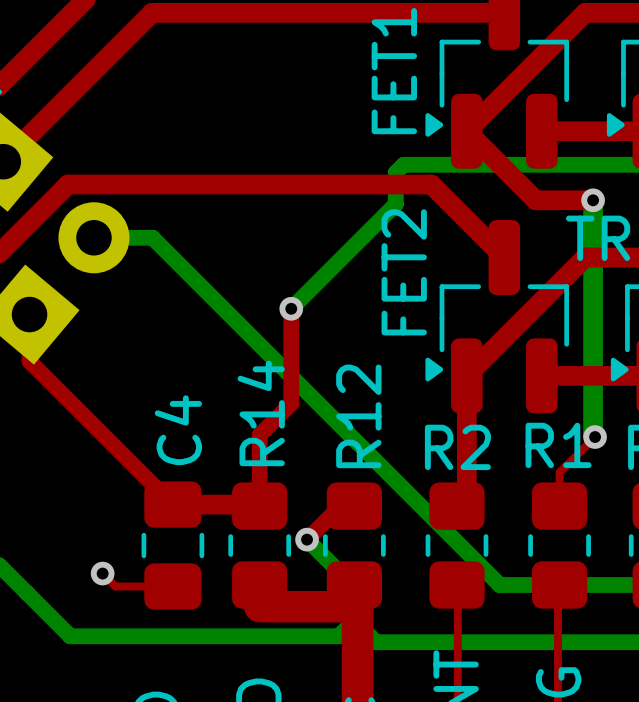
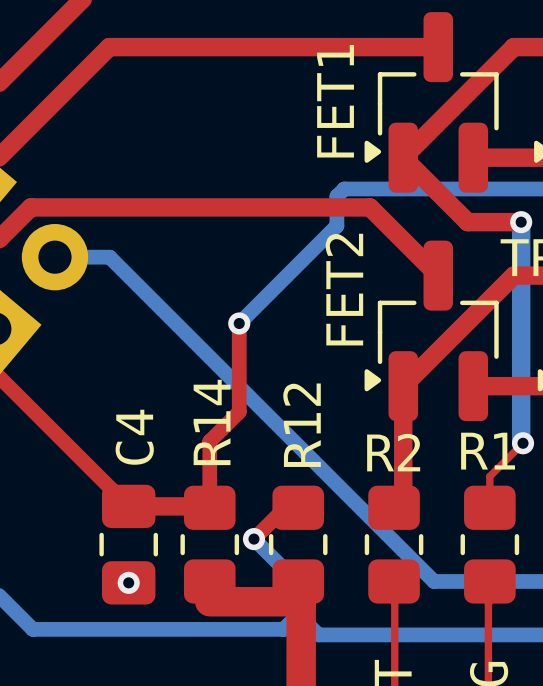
top track: (102, 573) (115, 586) (172, 586) -> none
via position: (102, 573) -> (128, 582)

